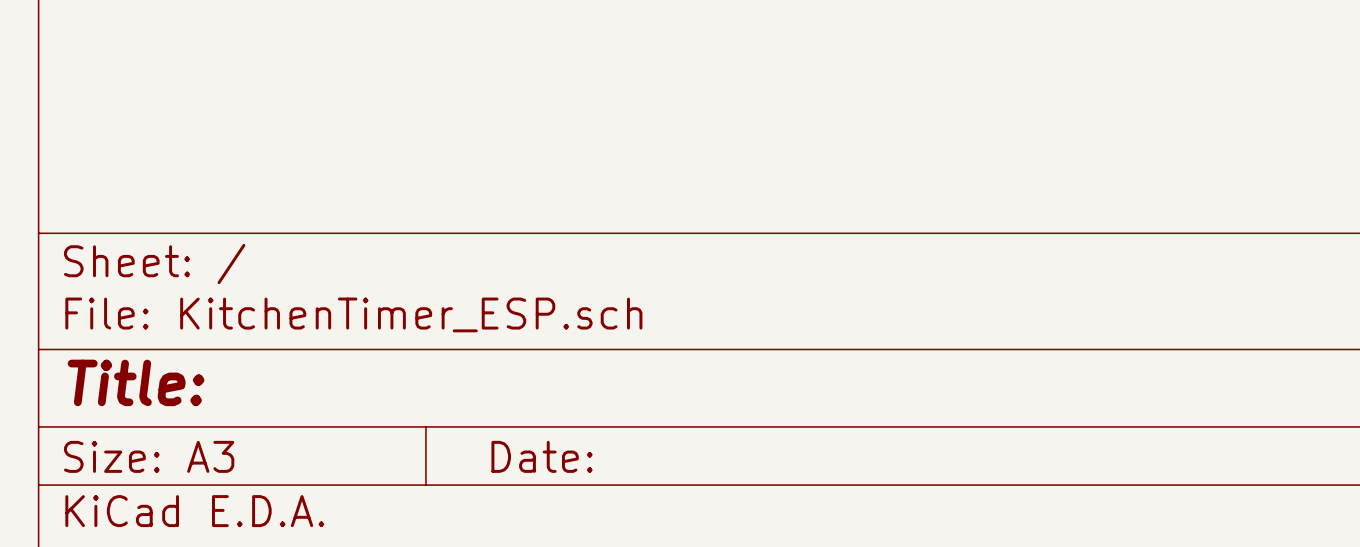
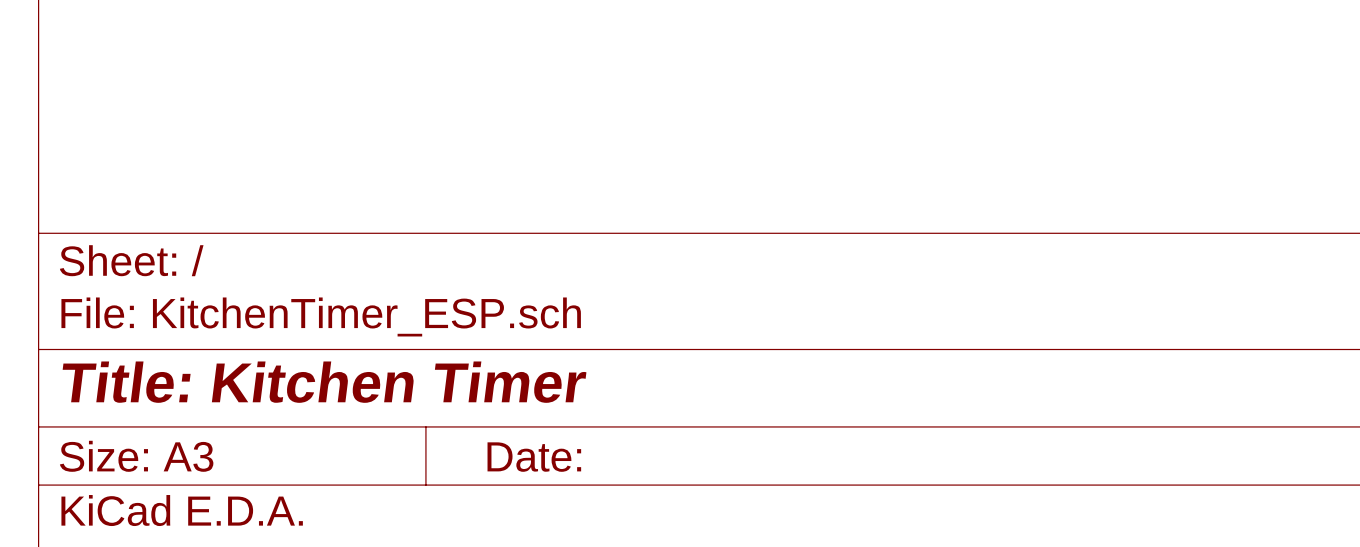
title block: Title: (136, 382) -> Title: Kitchen Timer (324, 382)

